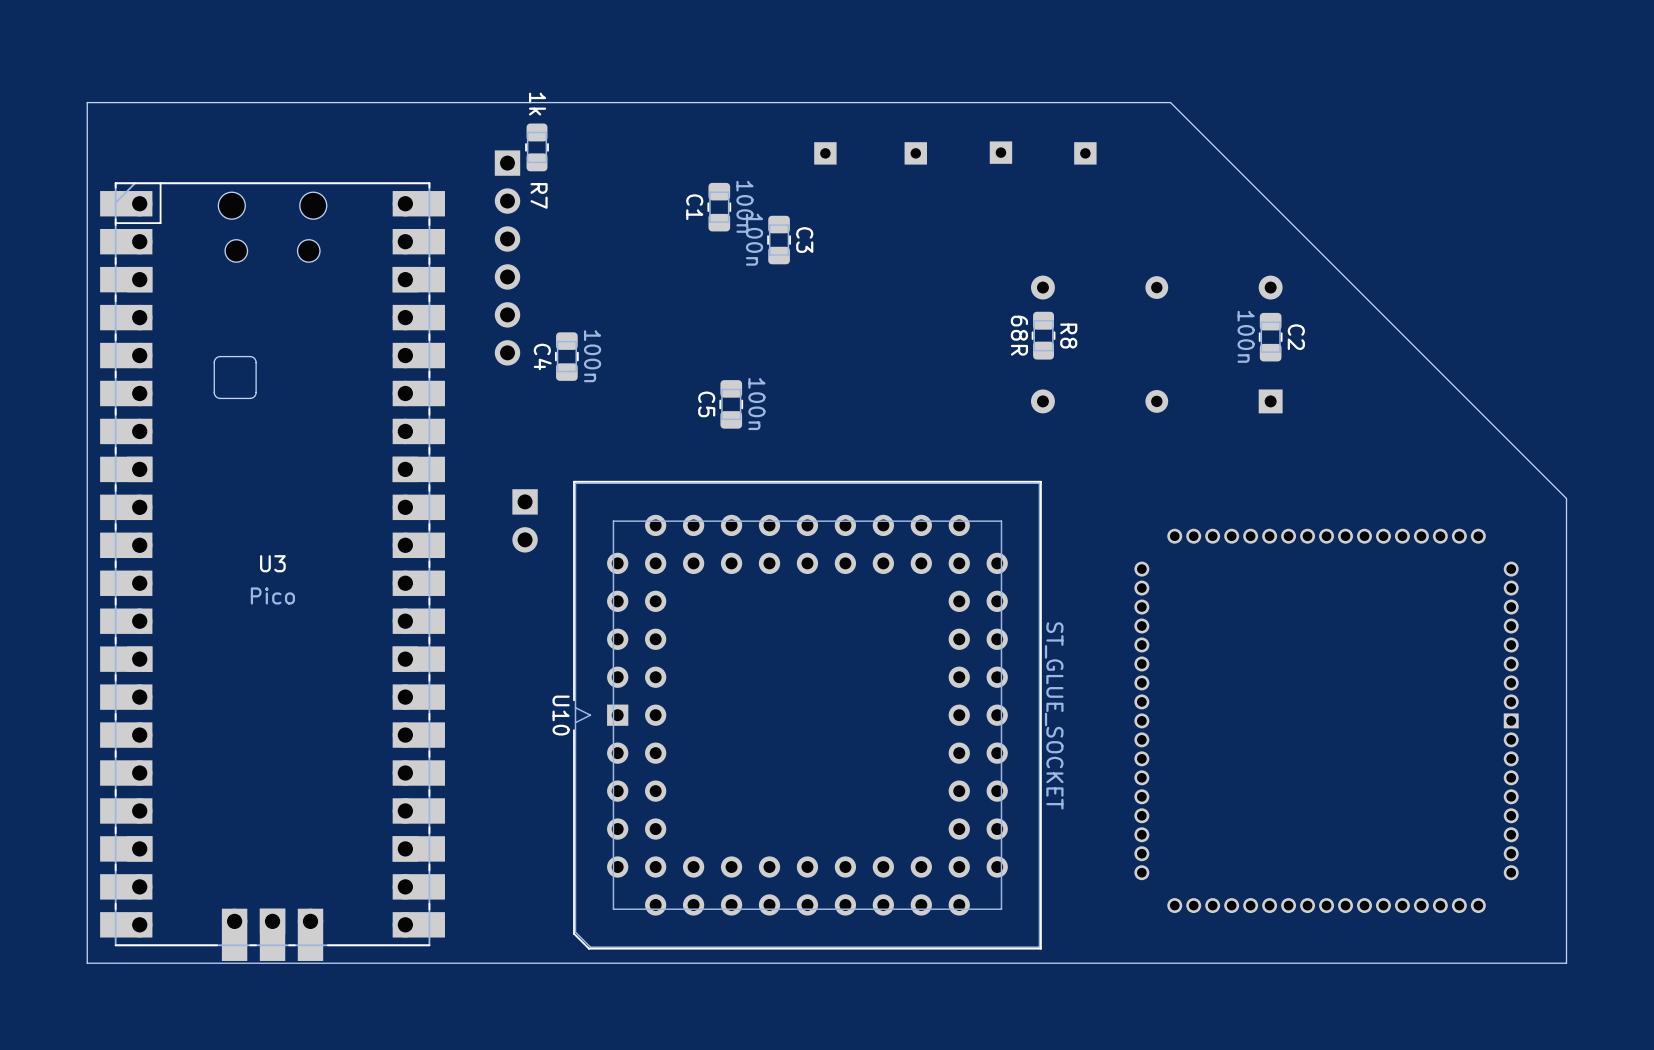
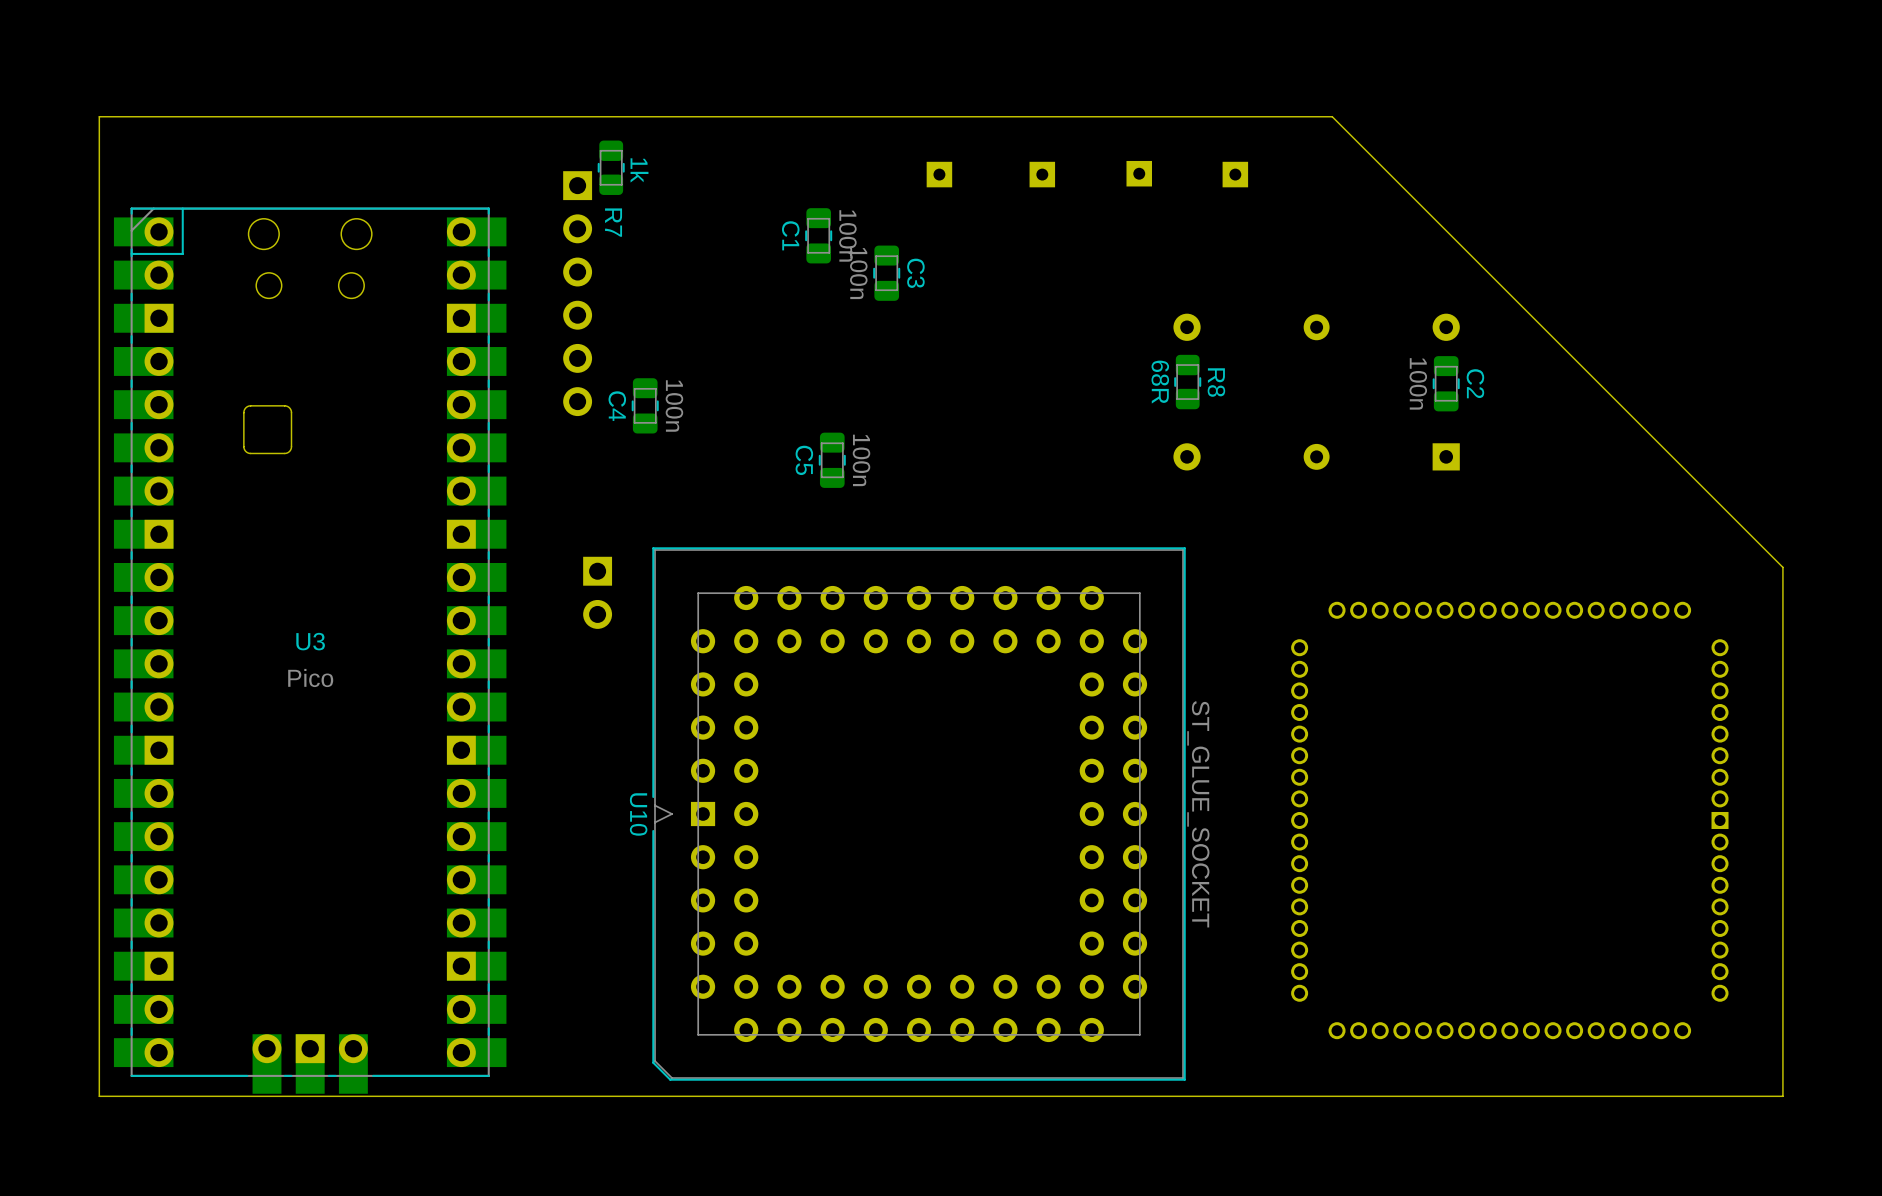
R7 value position: 1k (537, 104) -> 1k (639, 170)

